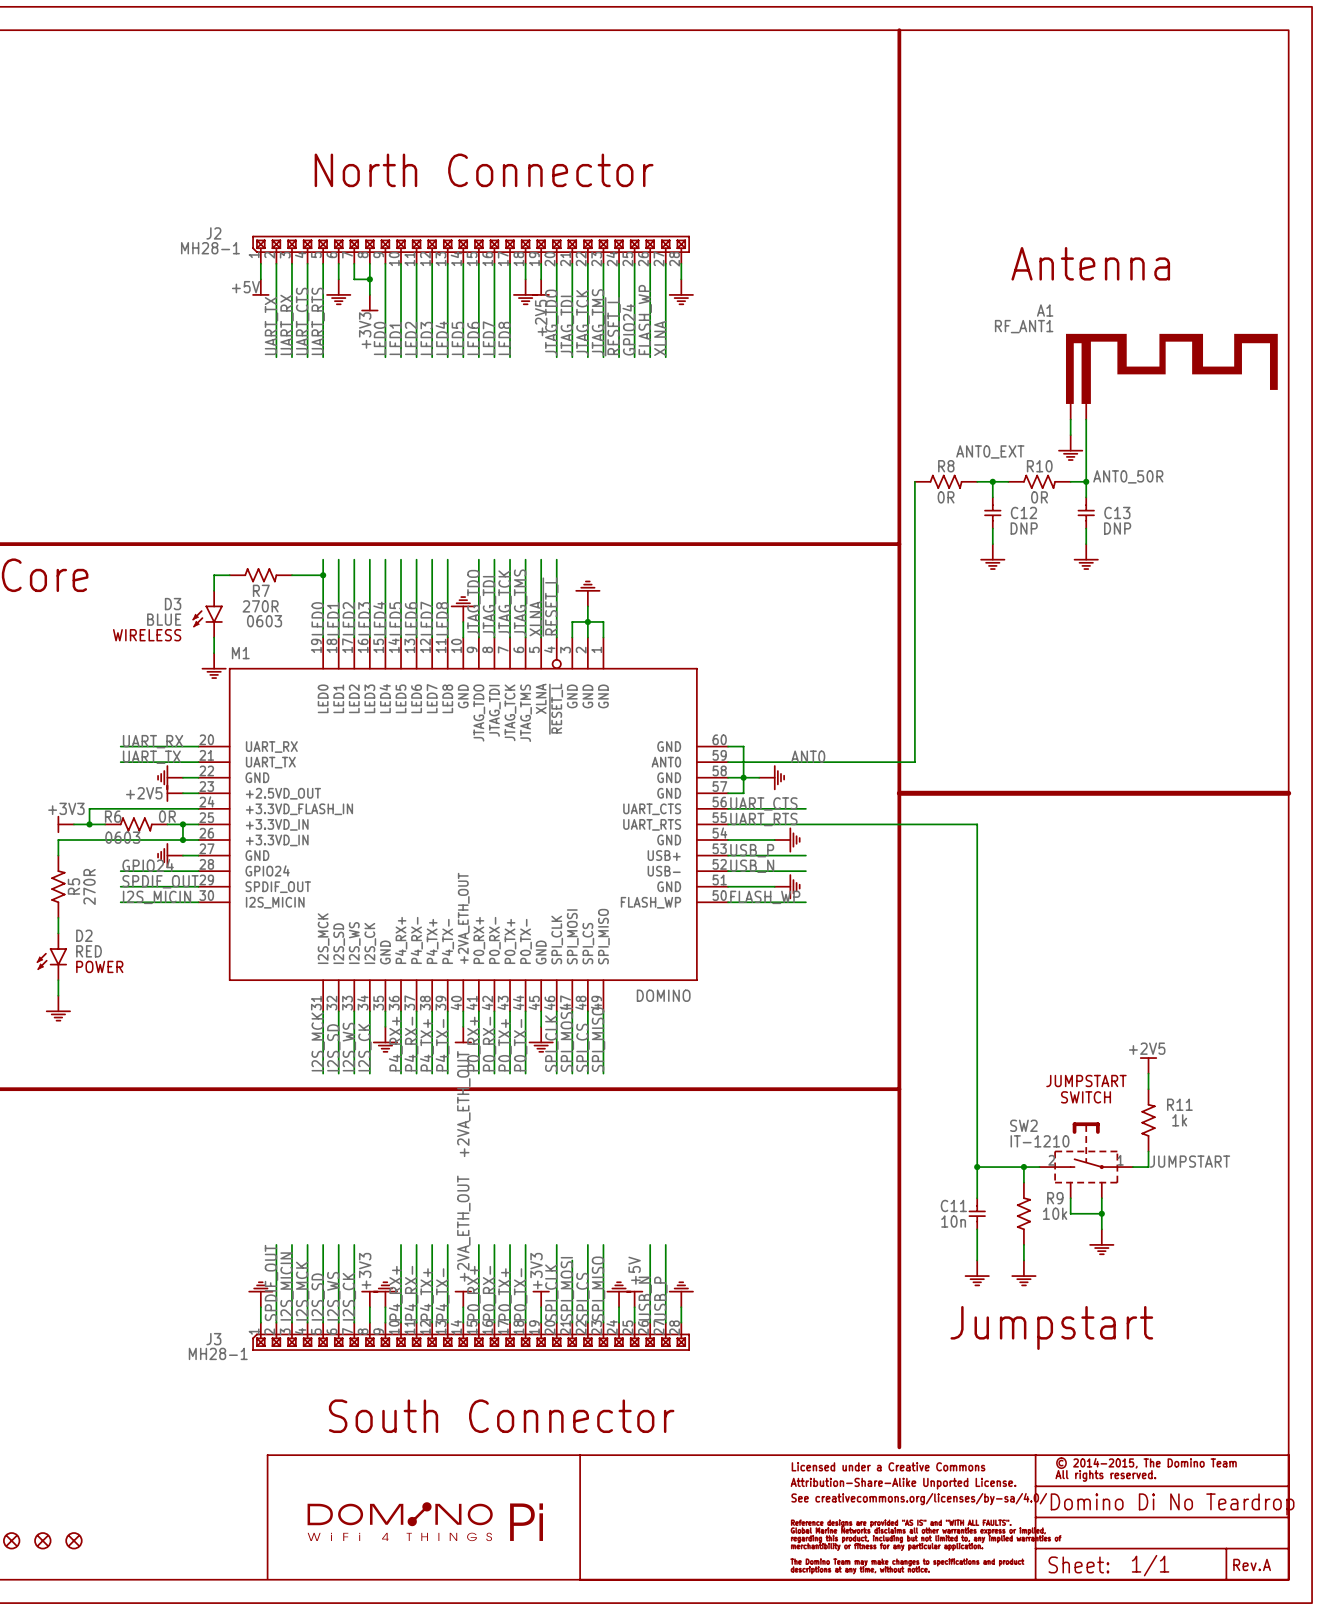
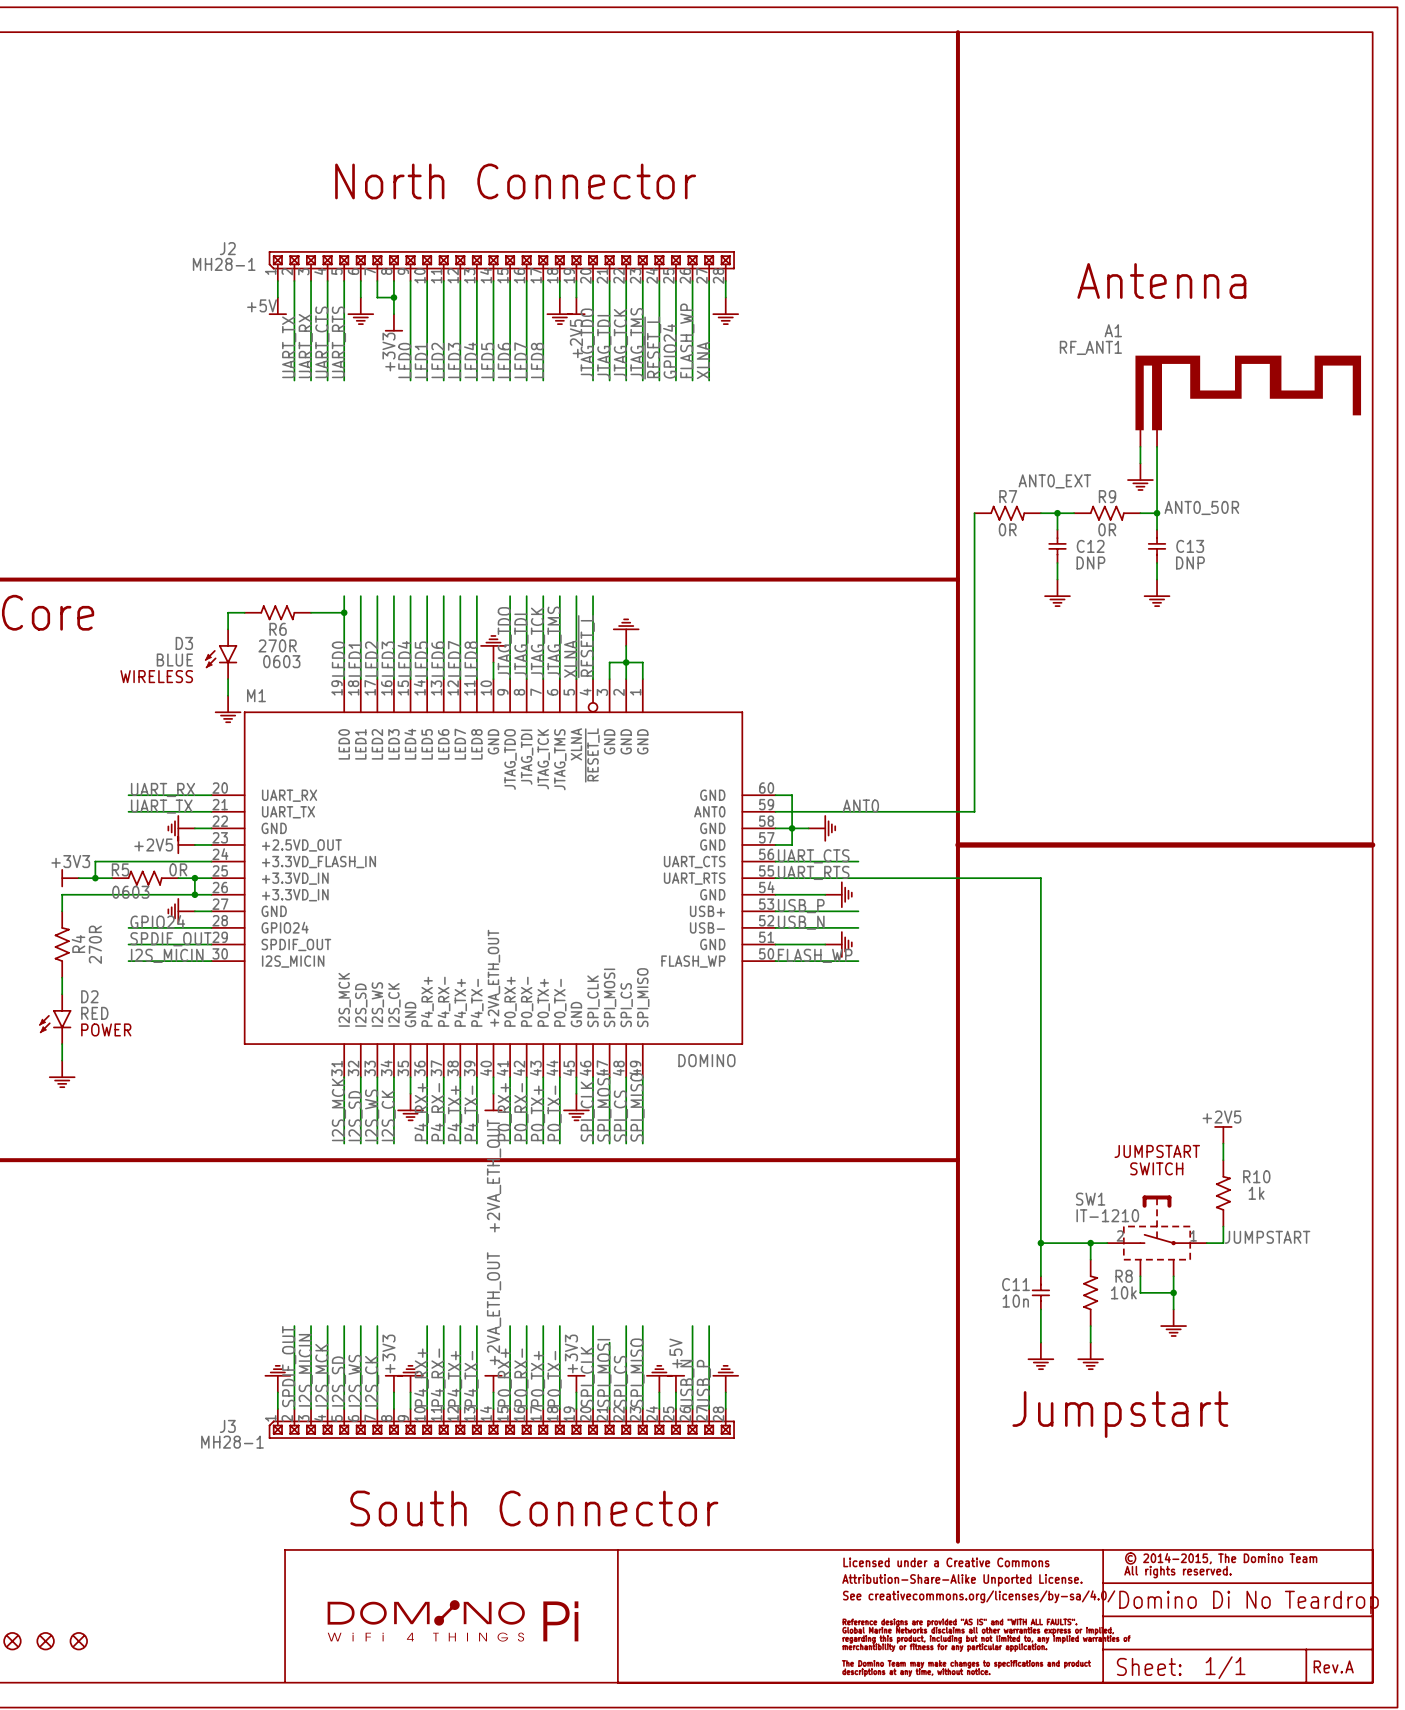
R8 name: R8 (946, 466) -> R7 (1008, 496)
R10 name: R10 (1039, 466) -> R9 (1107, 496)
R7 name: R7 (261, 590) -> R6 (278, 629)
R6 name: R6 (113, 816) -> R5 (120, 869)
R5 name: R5 (73, 886) -> R4 (78, 944)
R11 name: R11 (1179, 1104) -> R10 (1256, 1176)
SW2 name: SW2 (1023, 1125) -> SW1 (1090, 1199)
R9 name: R9 (1055, 1198) -> R8 (1124, 1276)

